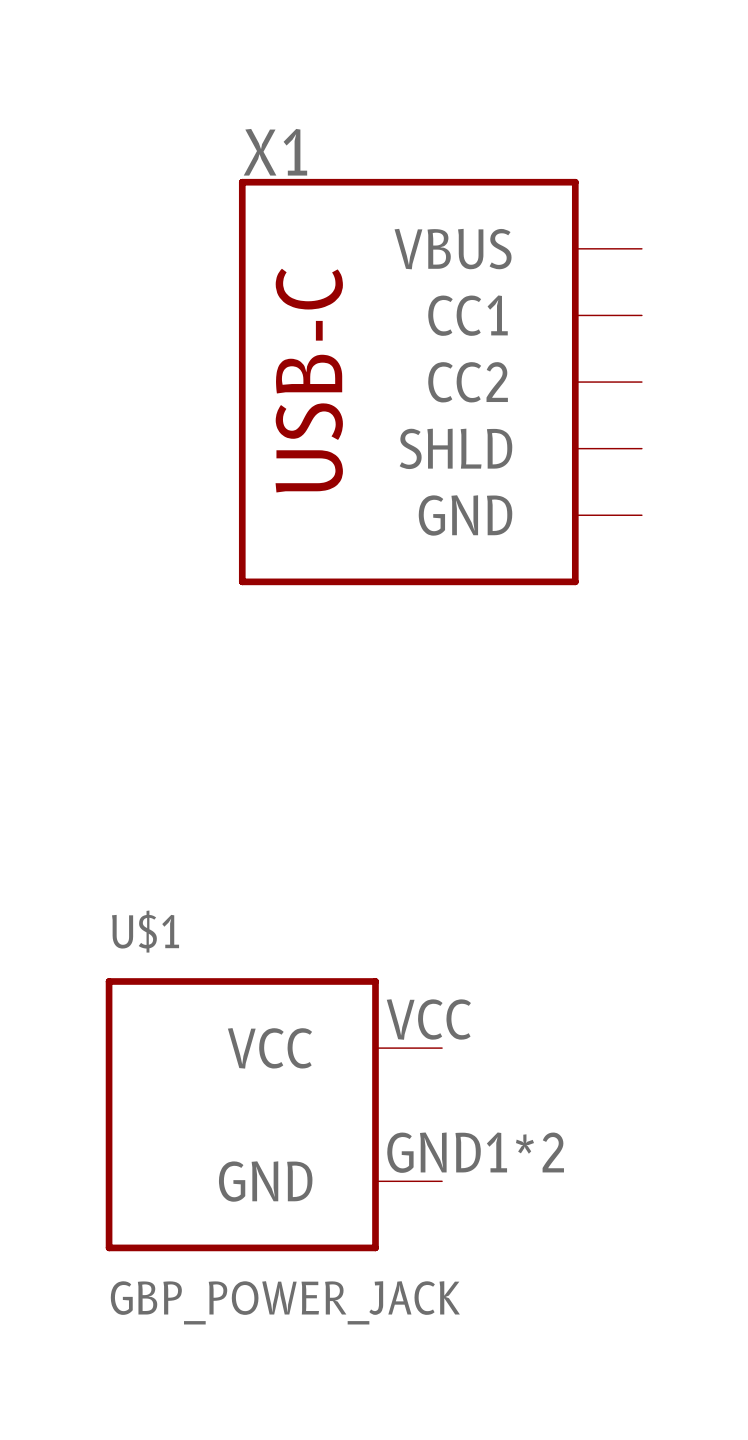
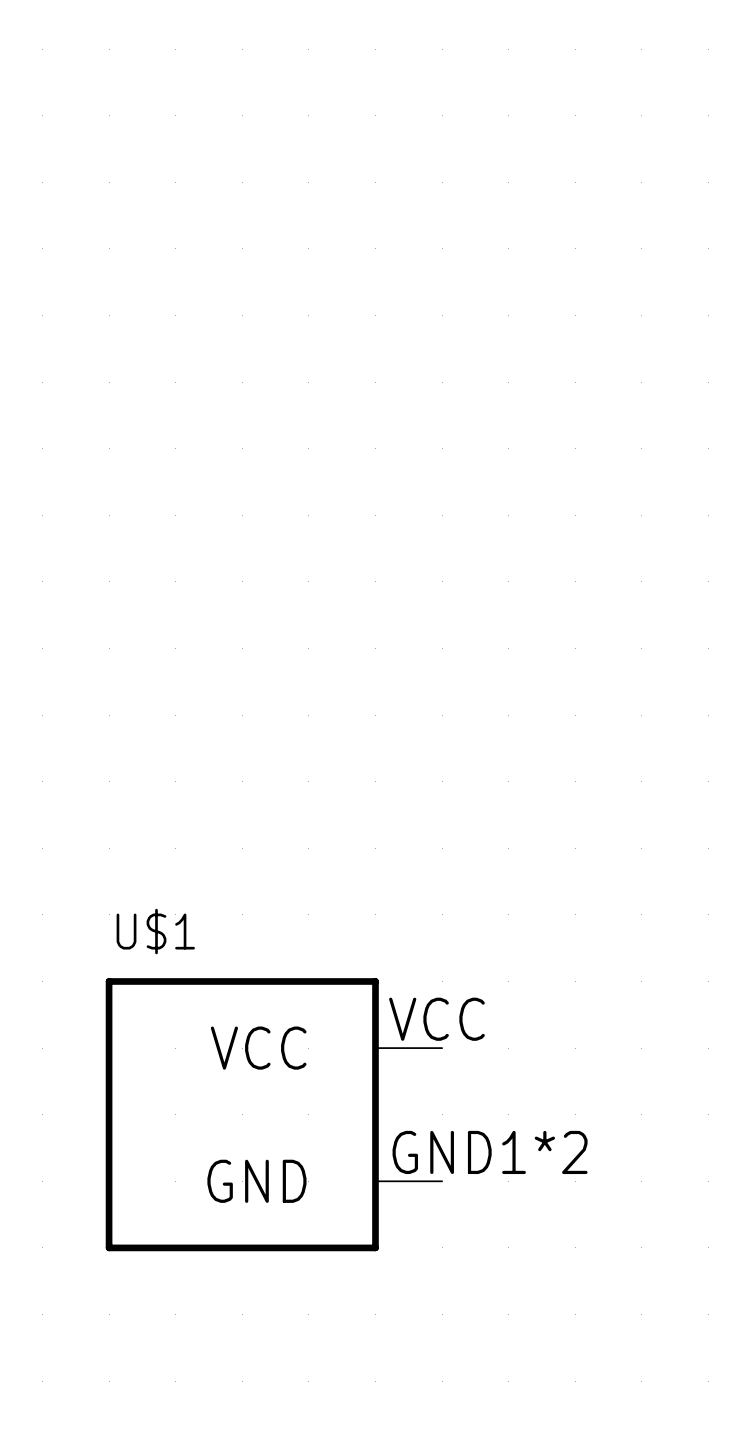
X1: (440, 382) -> none
U$1 value: GBP_POWER_JACK (285, 1302) -> none

